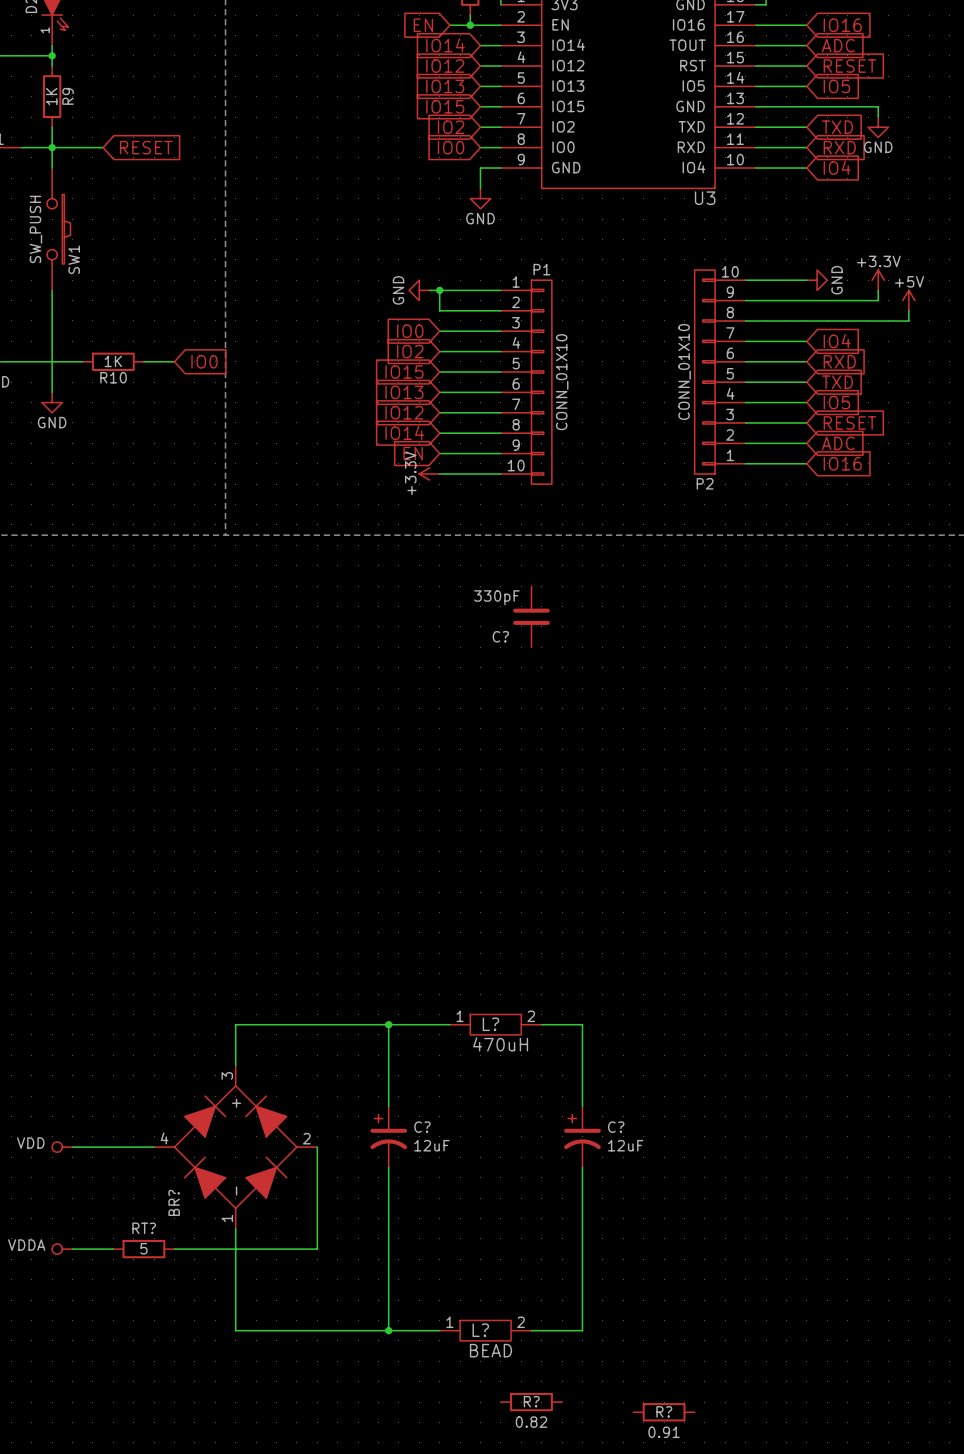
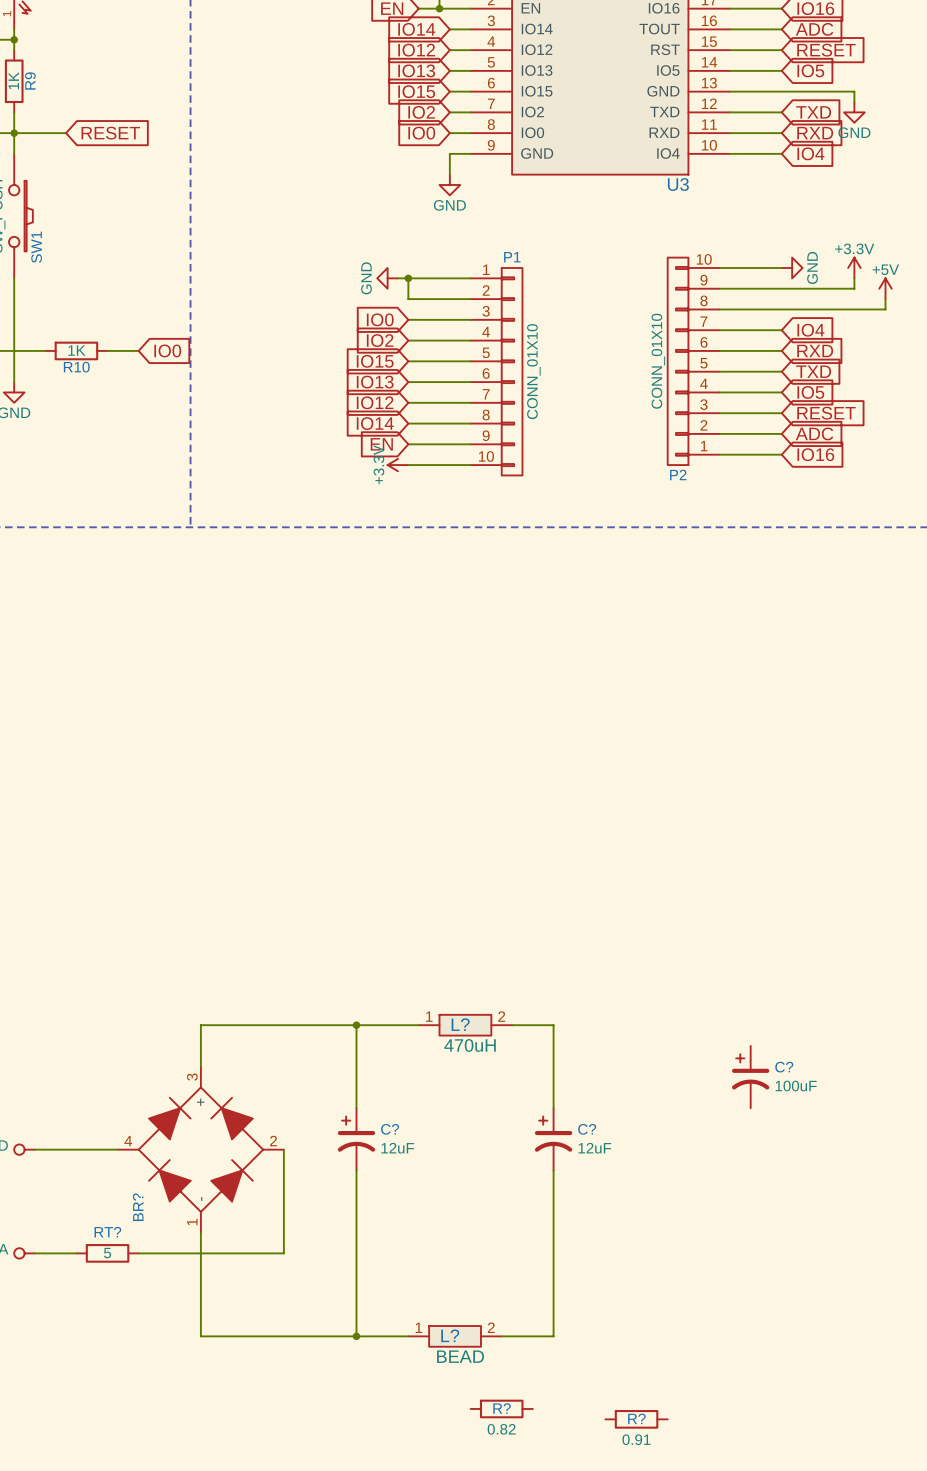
C?: 330pF (531, 616) -> none
C?: none -> 100uF (750, 1077)

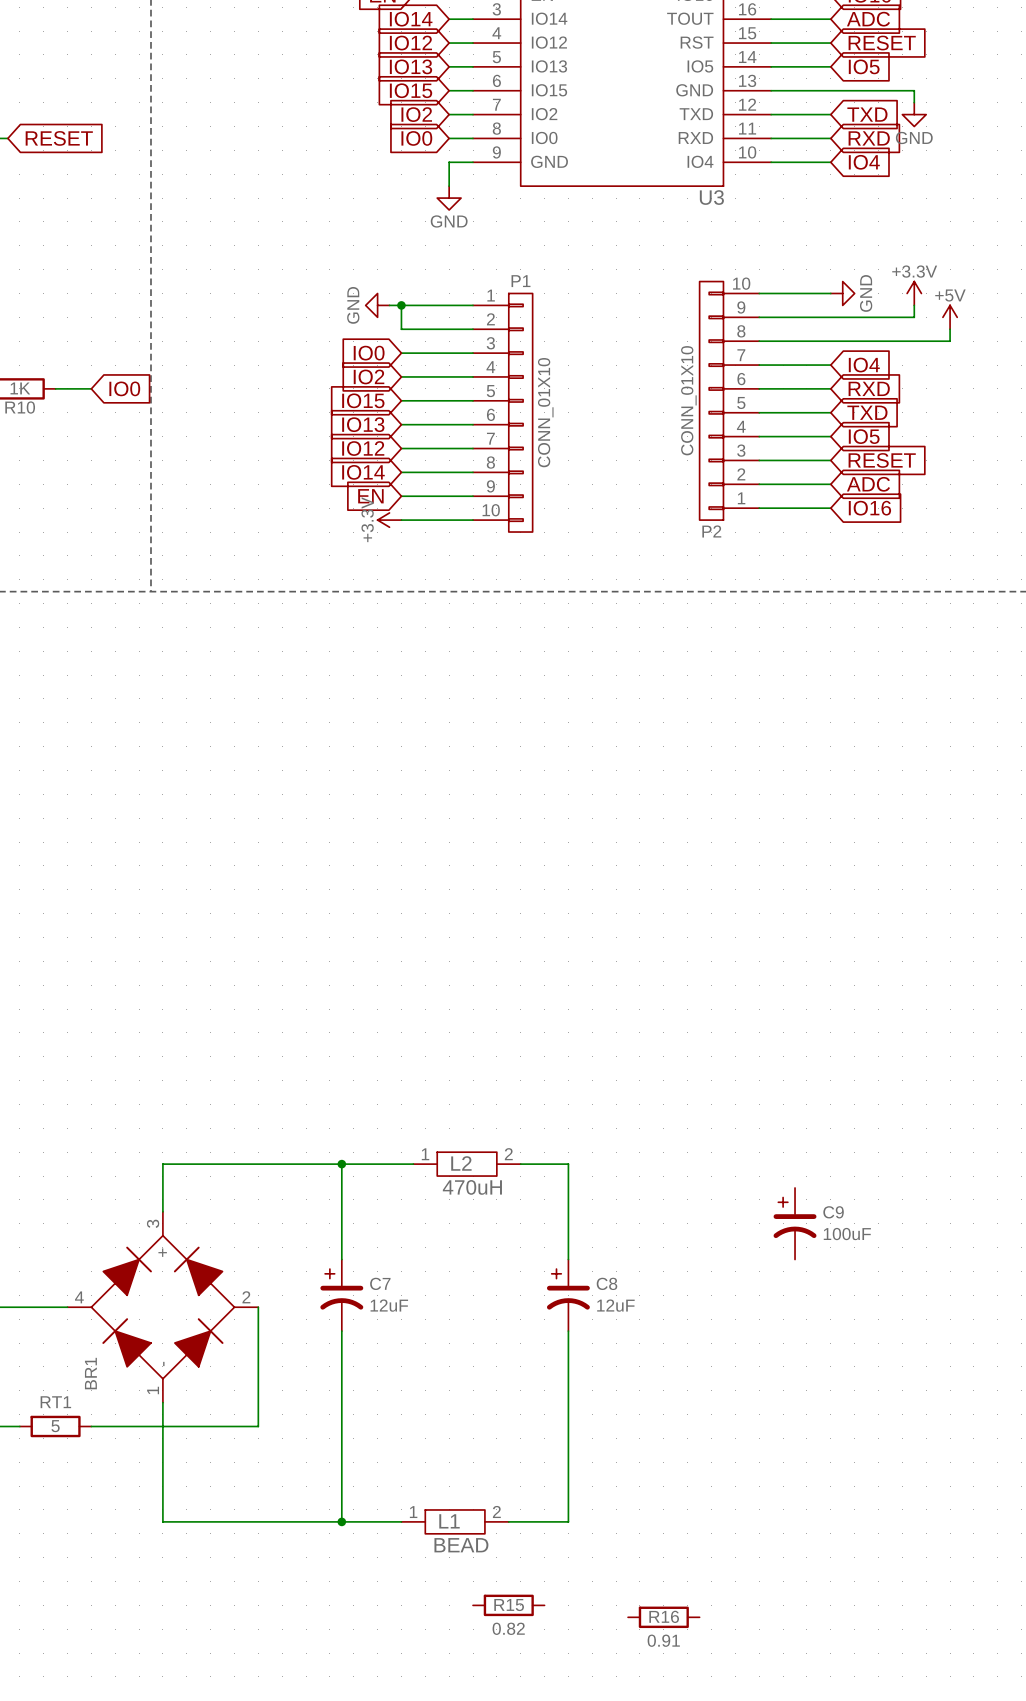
L? name: L? (460, 1024) -> L2 (461, 1163)
C? name: C? (784, 1067) -> C9 (833, 1212)
C? name: C? (390, 1129) -> C7 (380, 1283)
C? name: C? (587, 1129) -> C8 (606, 1283)
BR? name: BR? (138, 1207) -> BR1 (90, 1373)
RT? name: RT? (107, 1232) -> RT1 (55, 1402)
L? name: L? (450, 1335) -> L1 (449, 1521)
R? name: R? (502, 1408) -> R15 (509, 1605)
R? name: R? (636, 1418) -> R16 (664, 1616)

